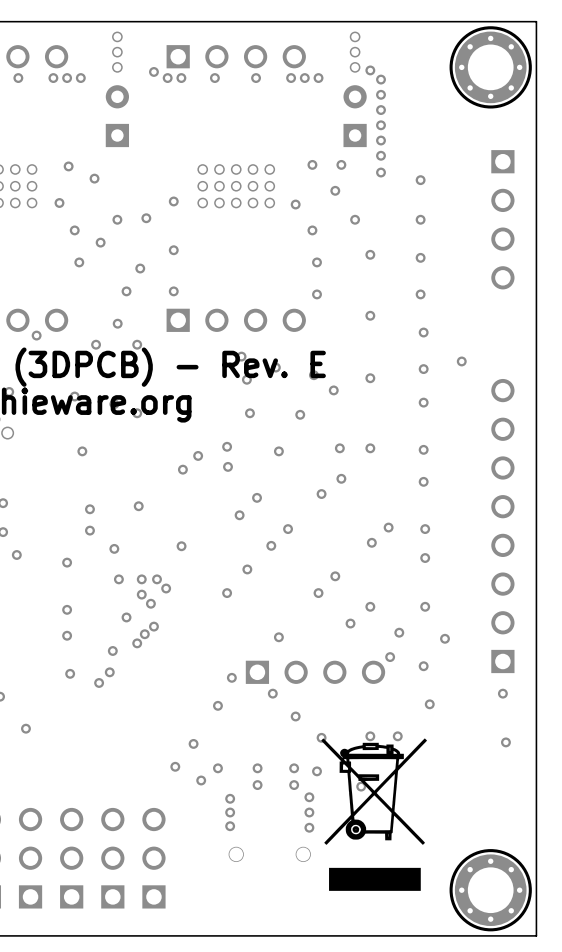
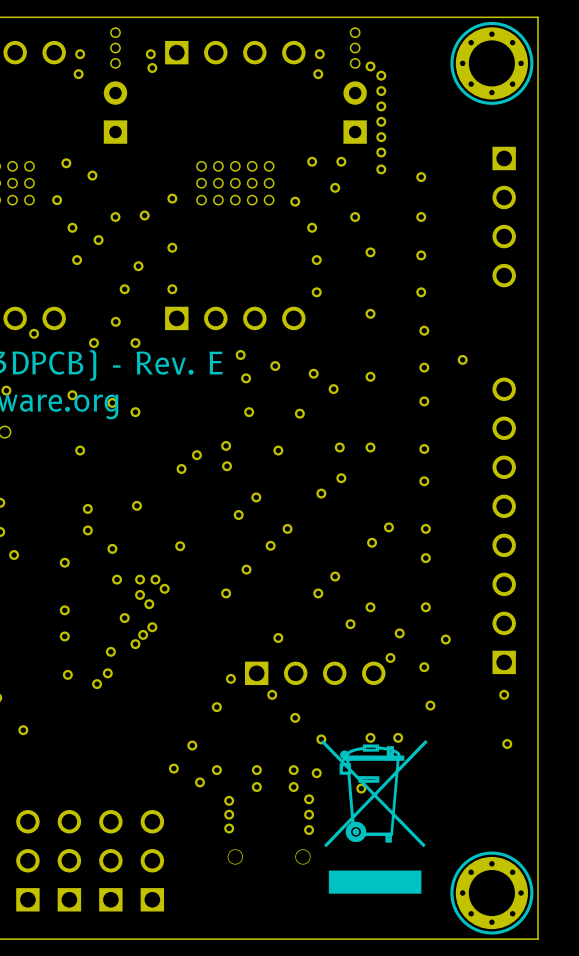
part: none -> (80, 54)
part: none -> (150, 54)
part: none -> (319, 54)
part: (18, 78) -> none
part: (53, 78) -> none
part: (67, 78) -> none
part: (167, 78) -> none
part: (181, 78) -> none
part: (214, 78) -> none
part: (256, 78) -> none
part: (291, 78) -> none
part: (304, 78) -> none

